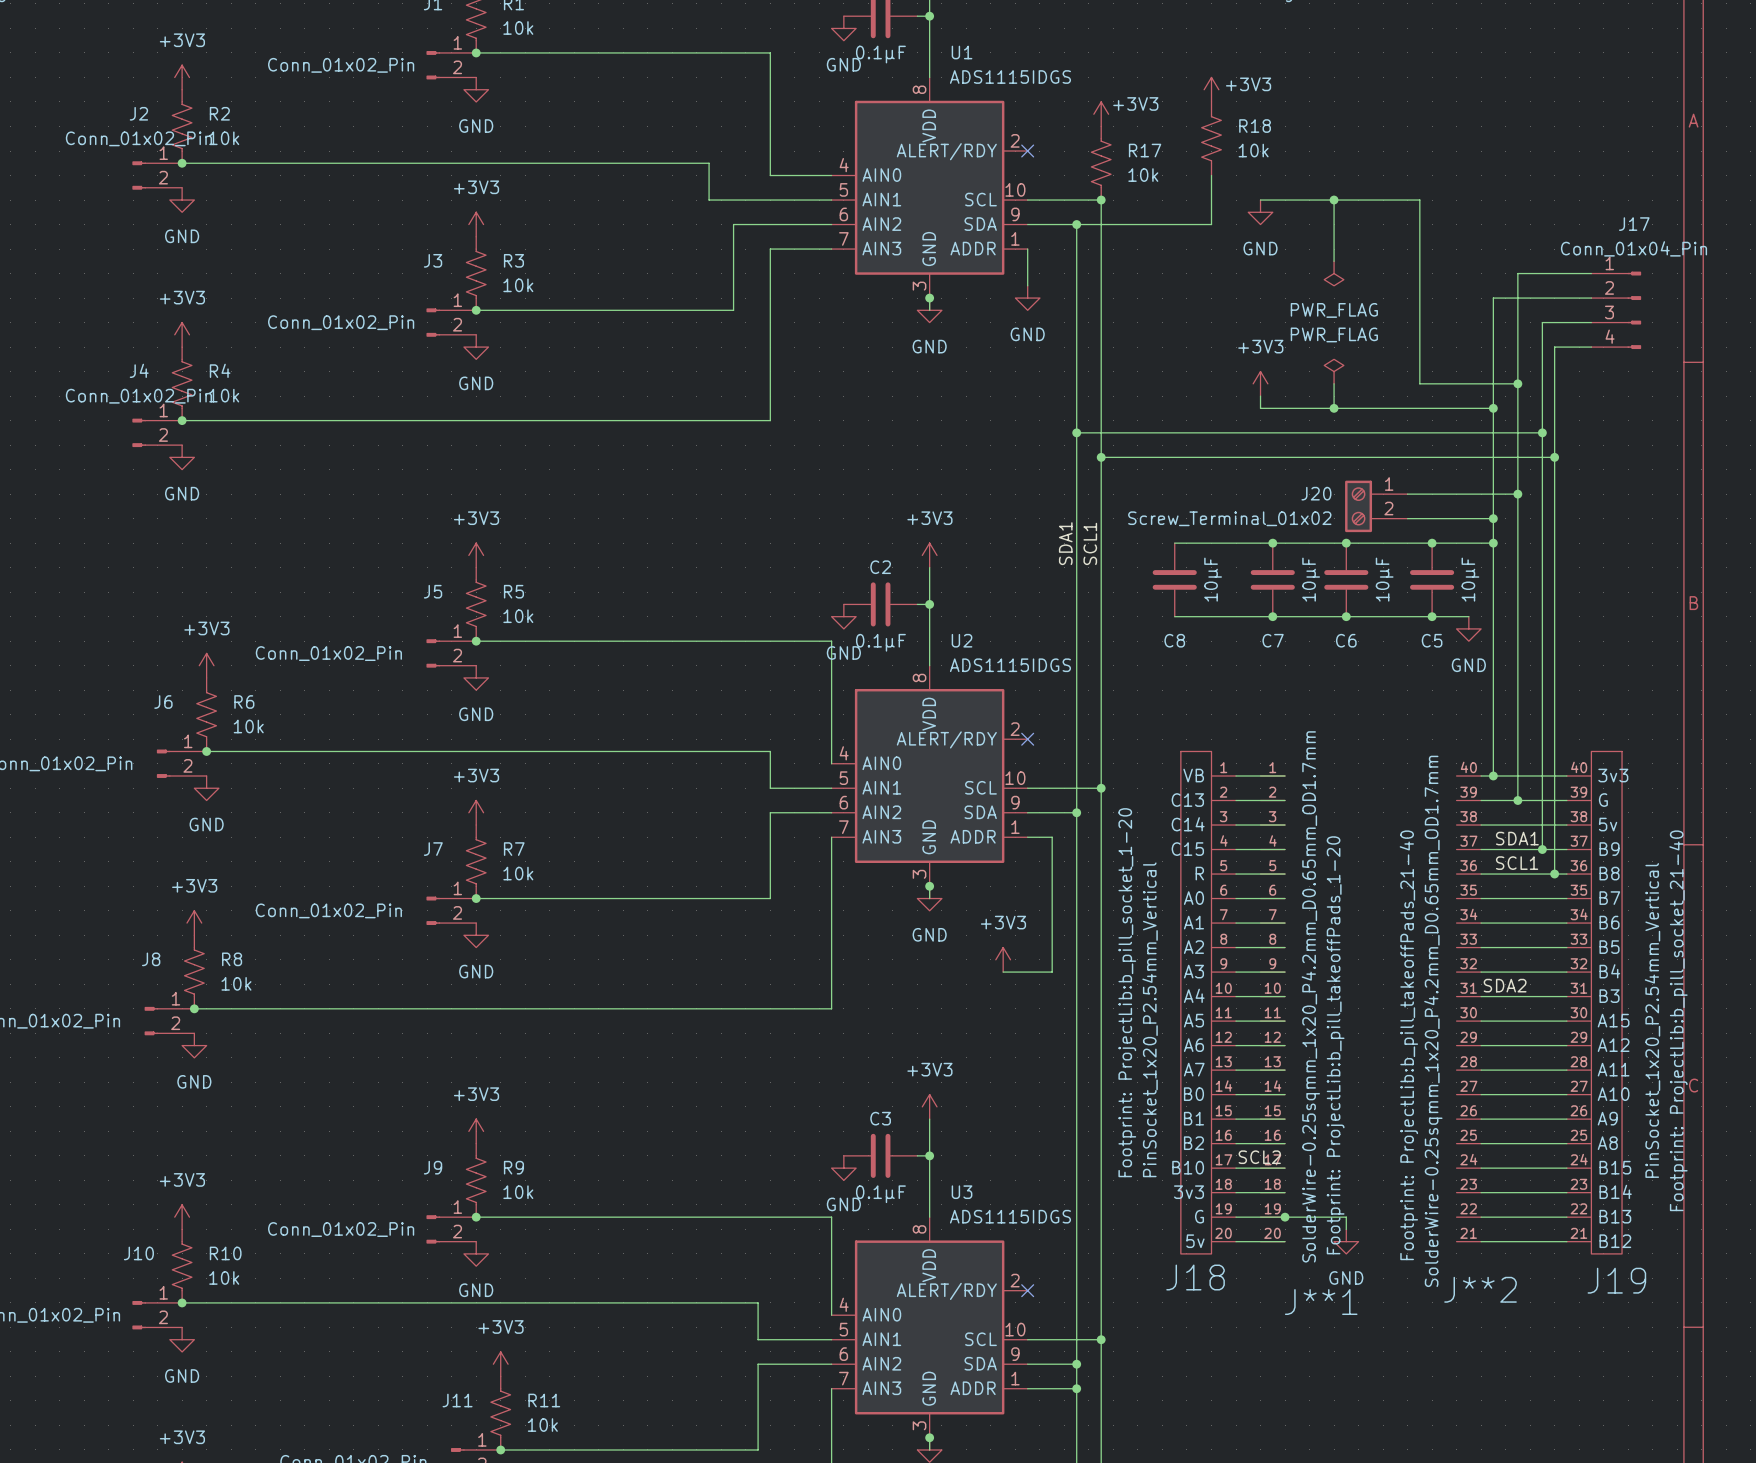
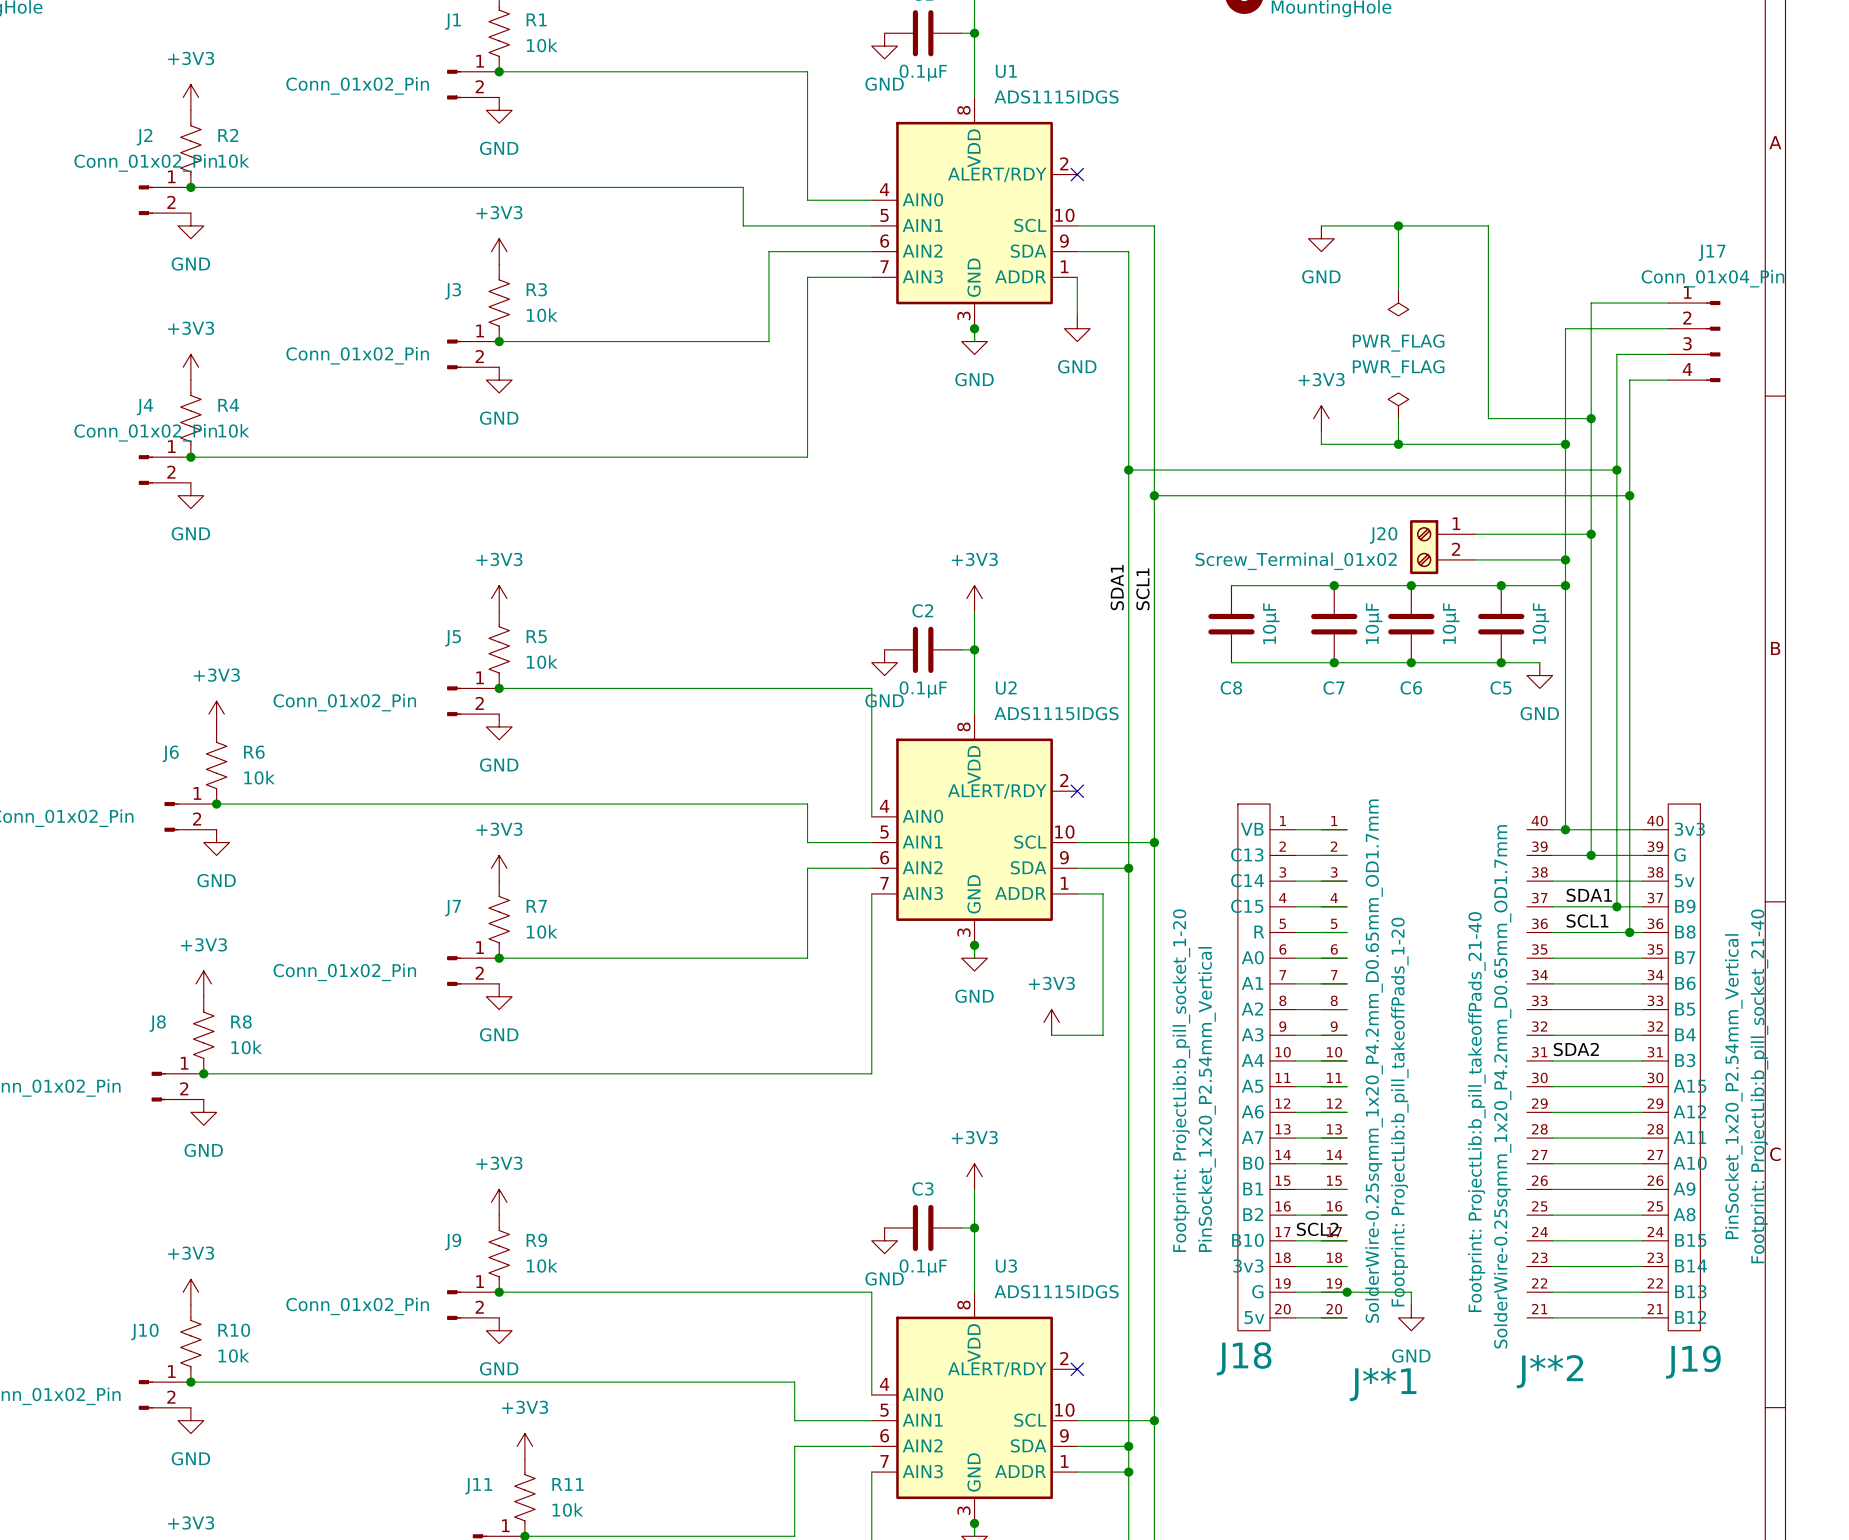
power symbol: +3V3 (1211, 89) -> none
power symbol: +3V3 (1101, 114) -> none
R18: 10k (1211, 138) -> none
R17: 10k (1101, 163) -> none
wire: (1211, 175) (1211, 224) (1076, 224) -> none
junction: (1101, 200) -> none
junction: (1076, 224) -> none

